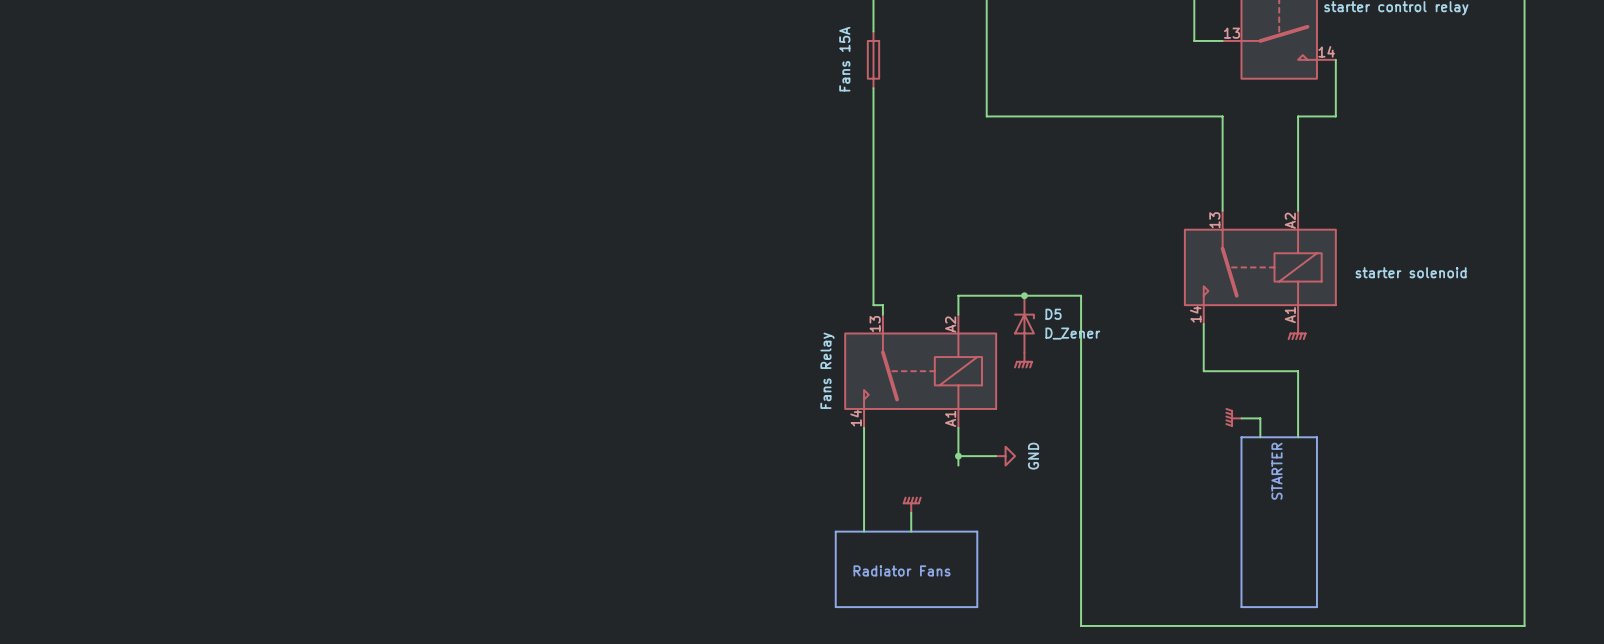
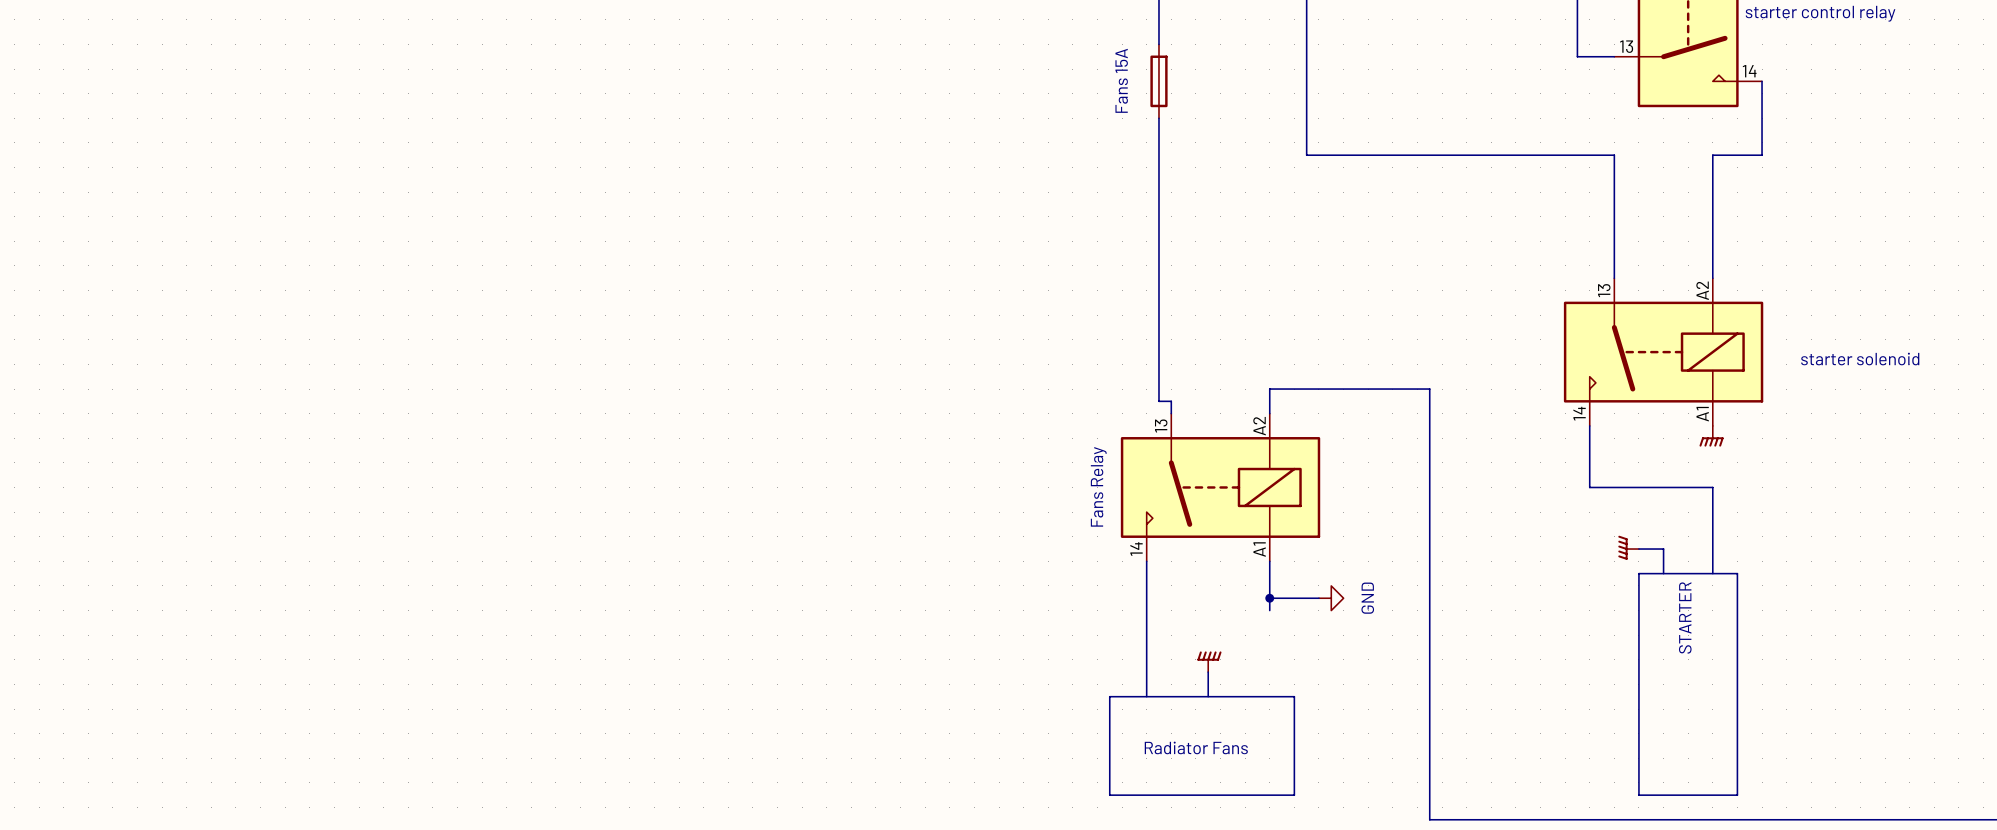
junction: (1024, 295) -> none
D5: D_Zener (1024, 324) -> none
power symbol: (1023, 360) -> none

